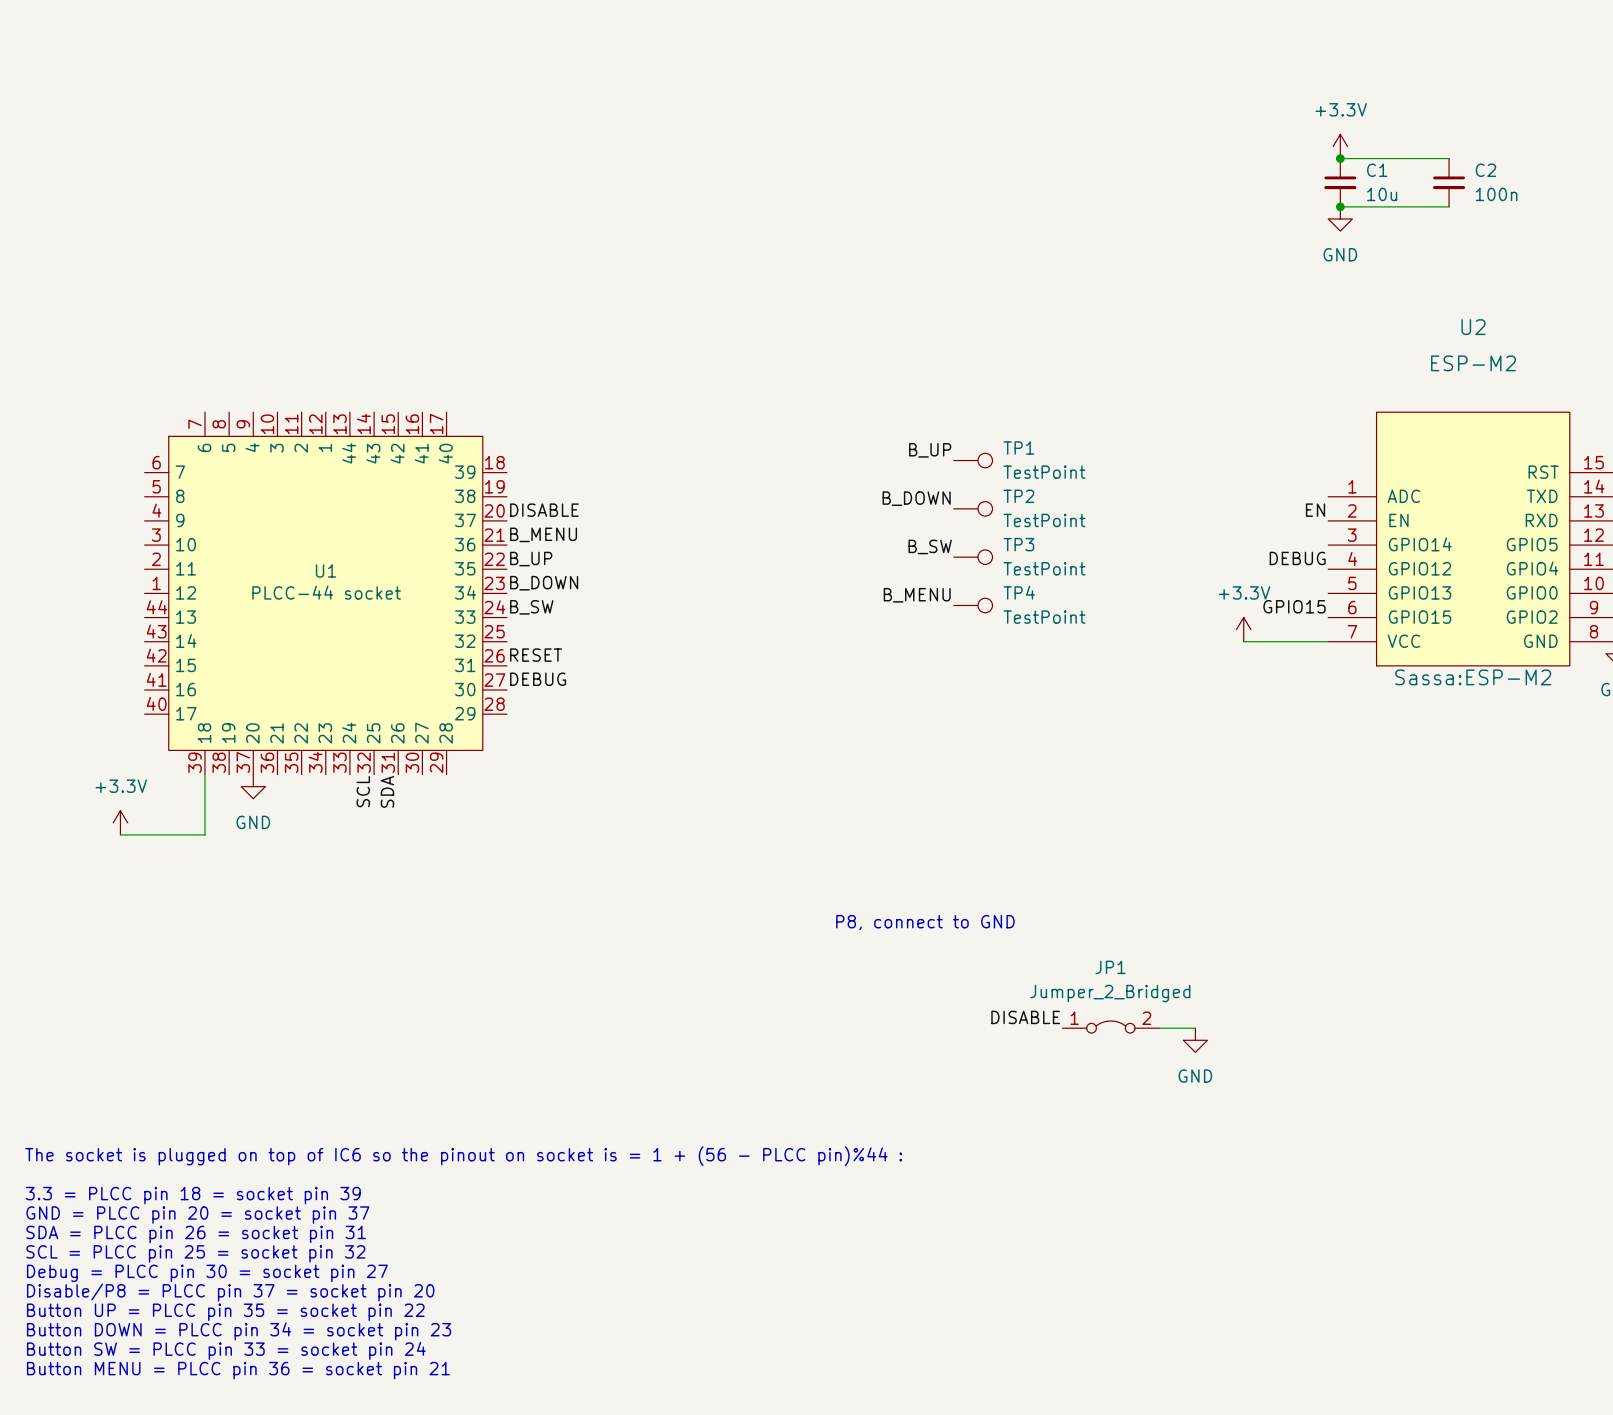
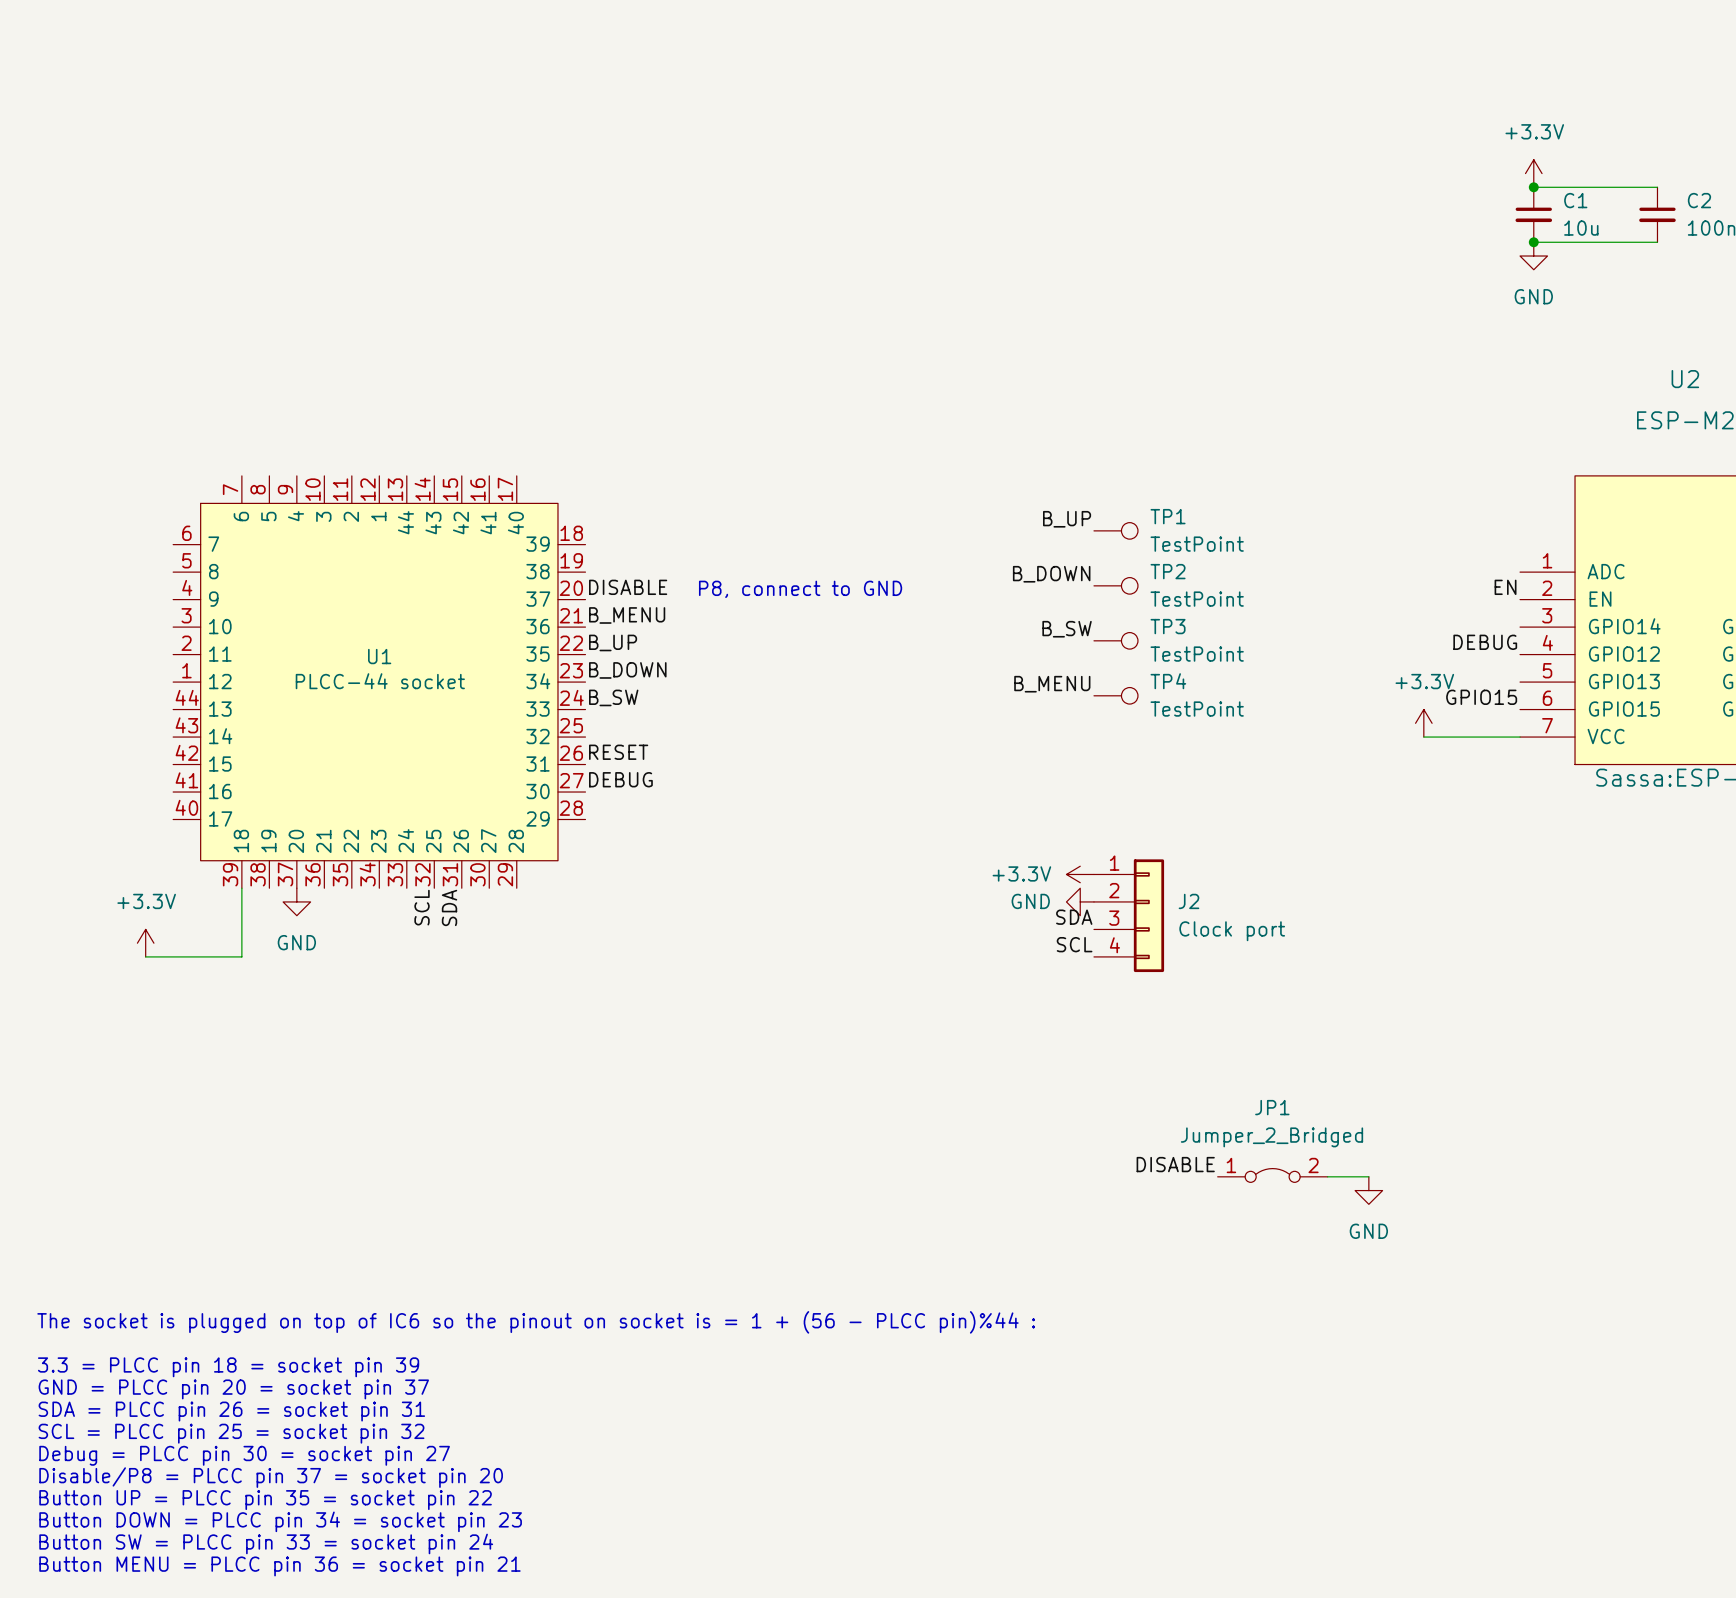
text: none -> P8, connect to GND (800, 589)
power symbol: none -> +3.3V (1080, 874)
power symbol: none -> GND (1080, 901)
J2: none -> Clock port (1129, 915)
label: none -> SDA (1074, 917)
label: none -> SCL (1074, 944)
text: P8, connect to GND (925, 922) -> none

